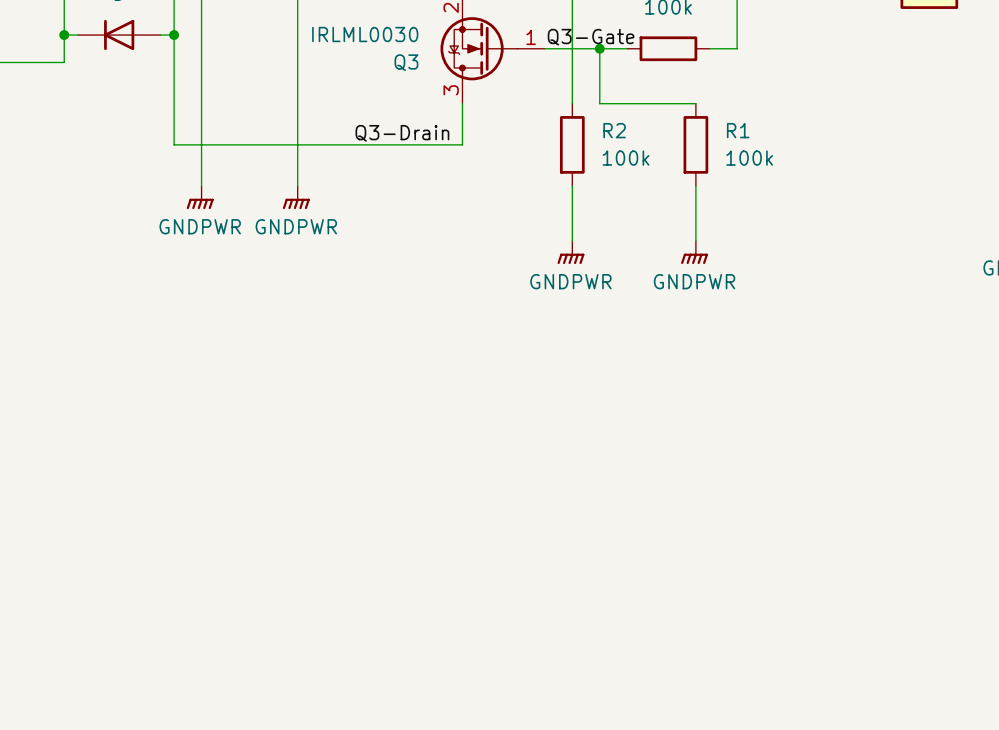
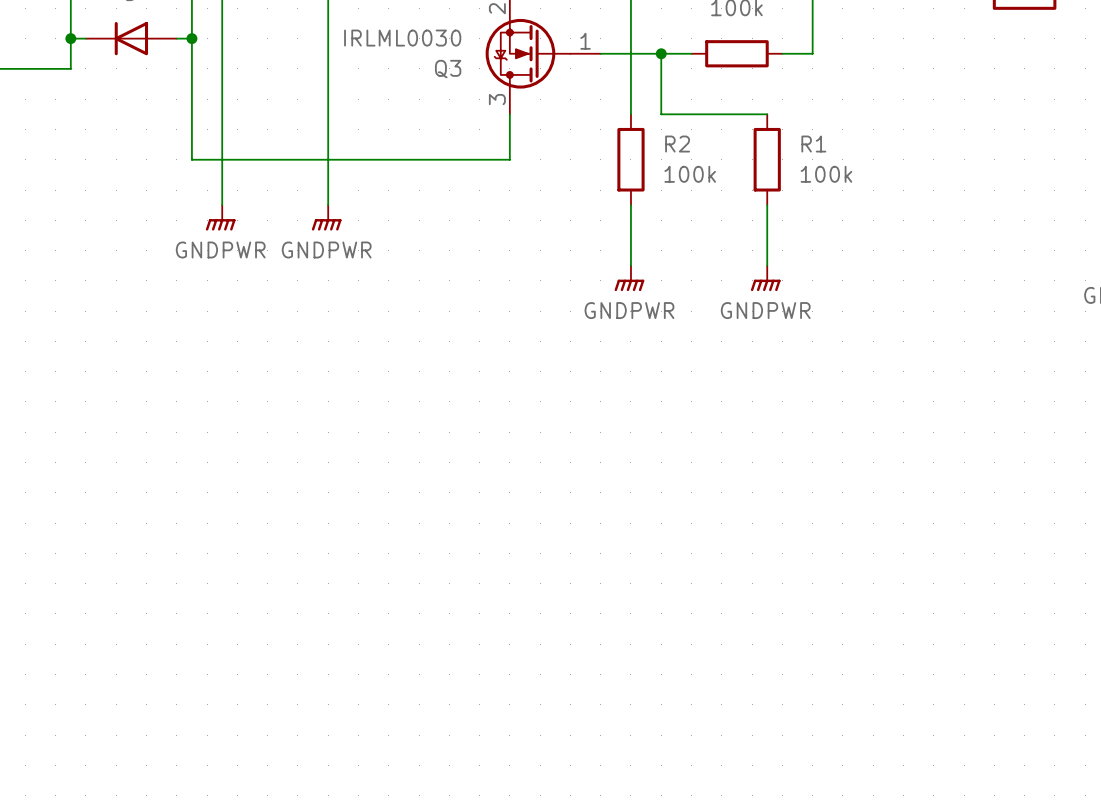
label: Q3-Gate (591, 37) -> none
label: Q3-Drain (402, 133) -> none

